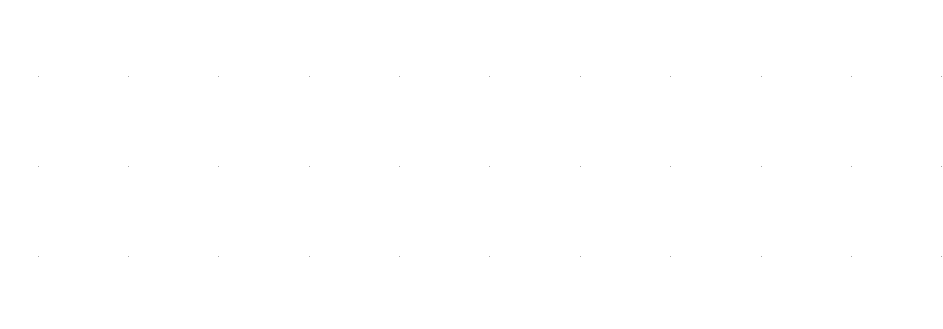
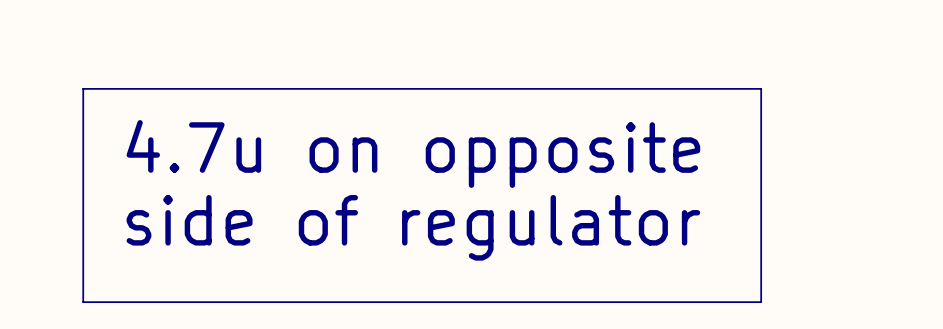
line: none -> (83, 88) (761, 88) (761, 302) (83, 302) (83, 88)
text: none -> 4.7u on opposite (413, 153)
text: none -> side of regulator (413, 227)

